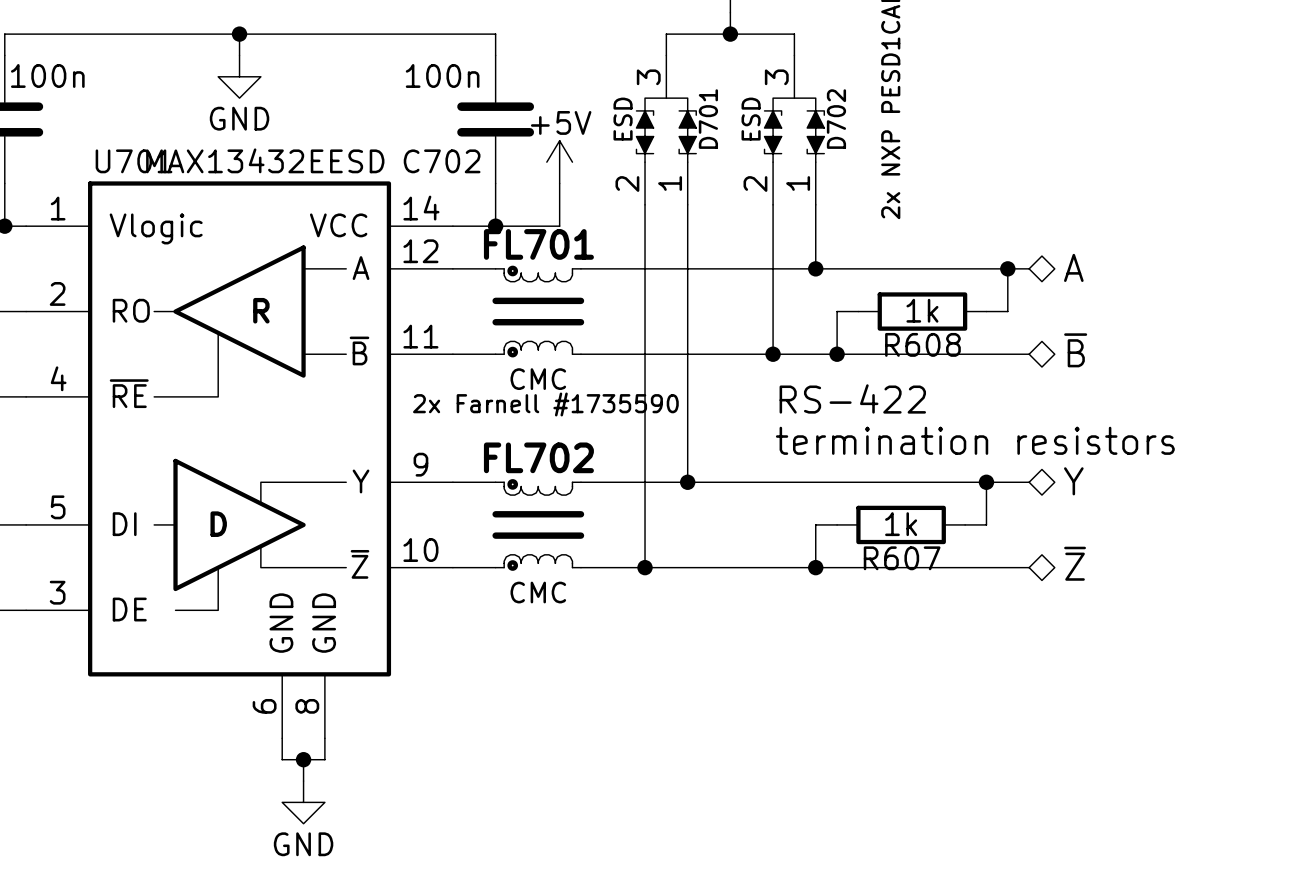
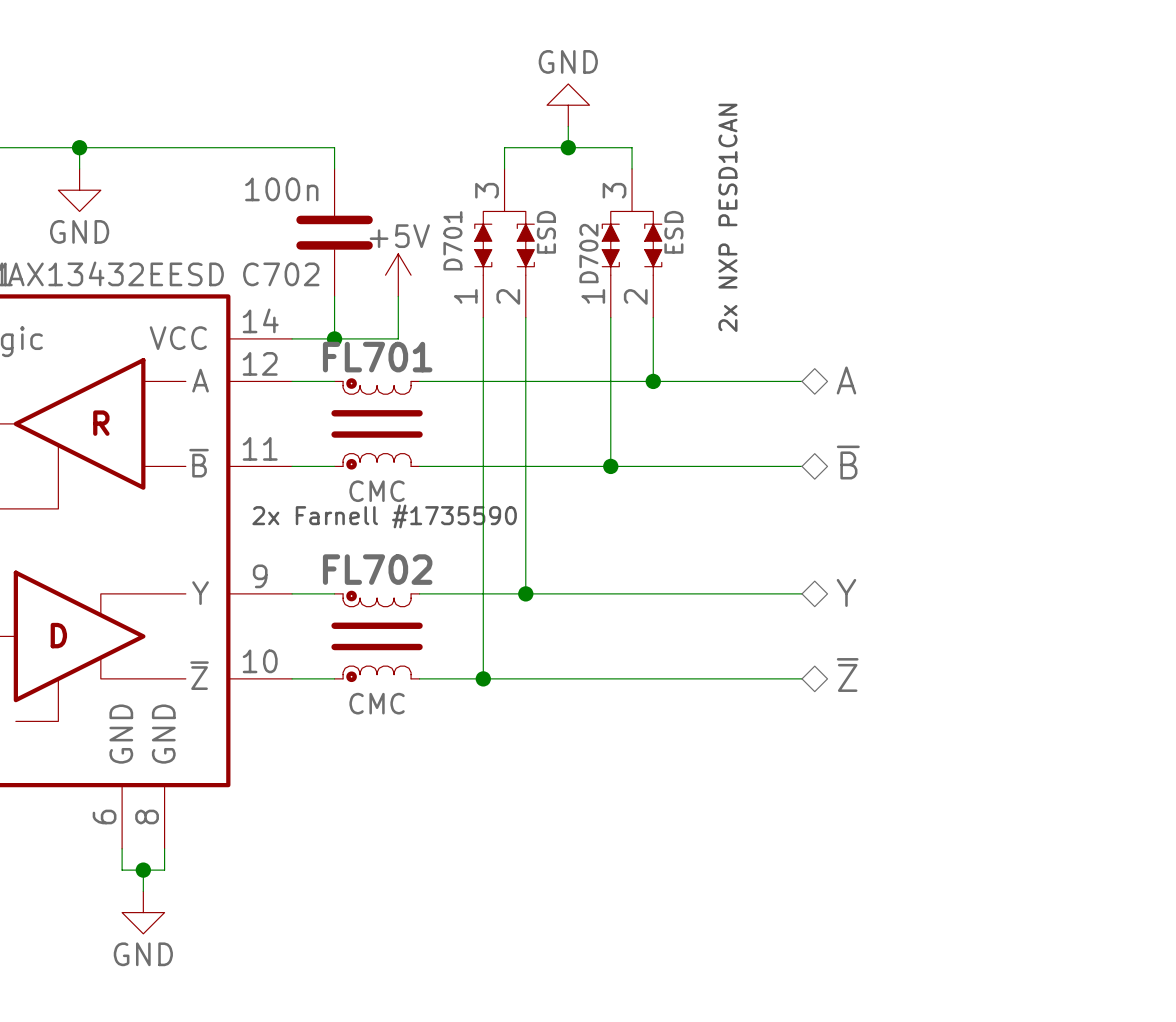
D701 flip: as is (666, 130) -> left-right (504, 243)
D702 flip: as is (794, 130) -> left-right (632, 243)
hierarchical label position: A (1073, 267) -> A (846, 380)
wire: (965, 268) (1029, 268) -> none
wire: (1007, 268) (1007, 311) (986, 311) -> none
junction: (1007, 268) -> none
wire: (858, 311) (837, 311) (837, 354) -> none
R608: 1k (922, 311) -> none
hierarchical label position: ~{B} (1075, 350) -> ~{B} (848, 462)
junction: (837, 354) -> none
wire: (965, 354) (1029, 354) -> none
text: RS-422 (852, 398) -> none
text: termination resistors (975, 440) -> none
hierarchical label position: Y (1073, 481) -> Y (846, 592)
wire: (965, 482) (1029, 482) -> none
wire: (986, 482) (986, 524) (965, 524) -> none
junction: (986, 482) -> none
wire: (837, 524) (815, 524) (815, 567) -> none
R607: 1k (901, 524) -> none
hierarchical label position: ~{Z} (1075, 563) -> ~{Z} (847, 675)
junction: (815, 567) -> none
wire: (965, 567) (1029, 567) -> none

